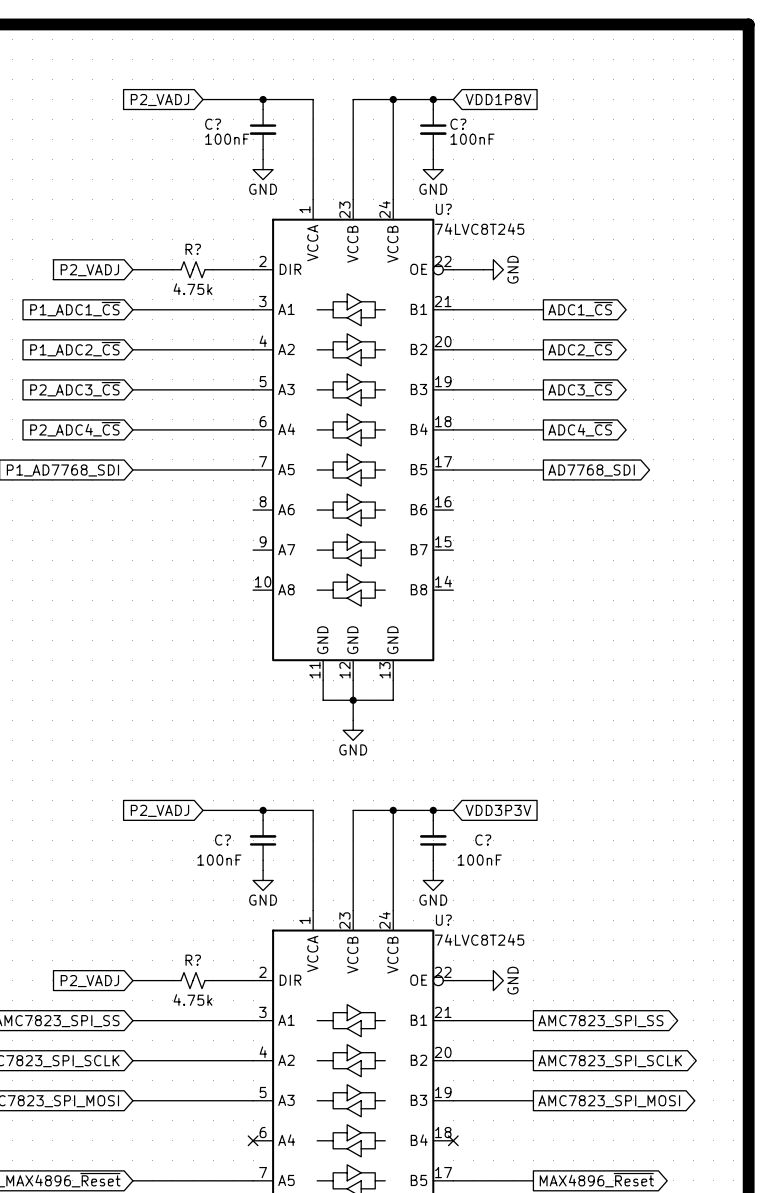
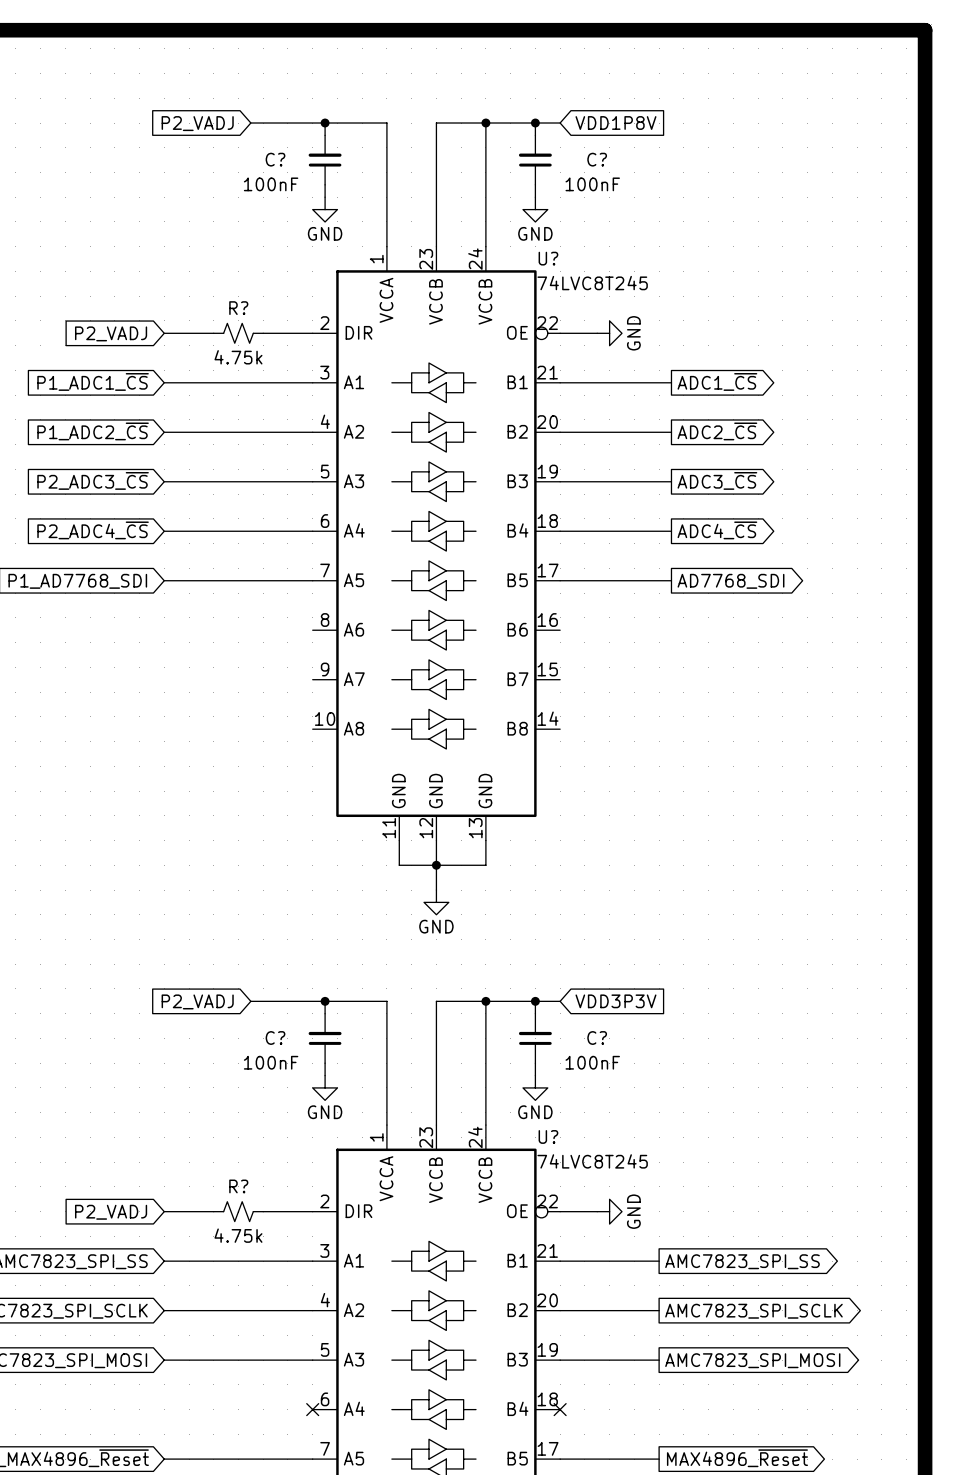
C? name position: C? (458, 124) -> C? (597, 159)
C? rotation: 0° (263, 129) -> 180° (325, 160)
C? rotation: 0° (433, 129) -> 180° (535, 160)
C? value position: 100nF (227, 139) -> 100nF (271, 184)

